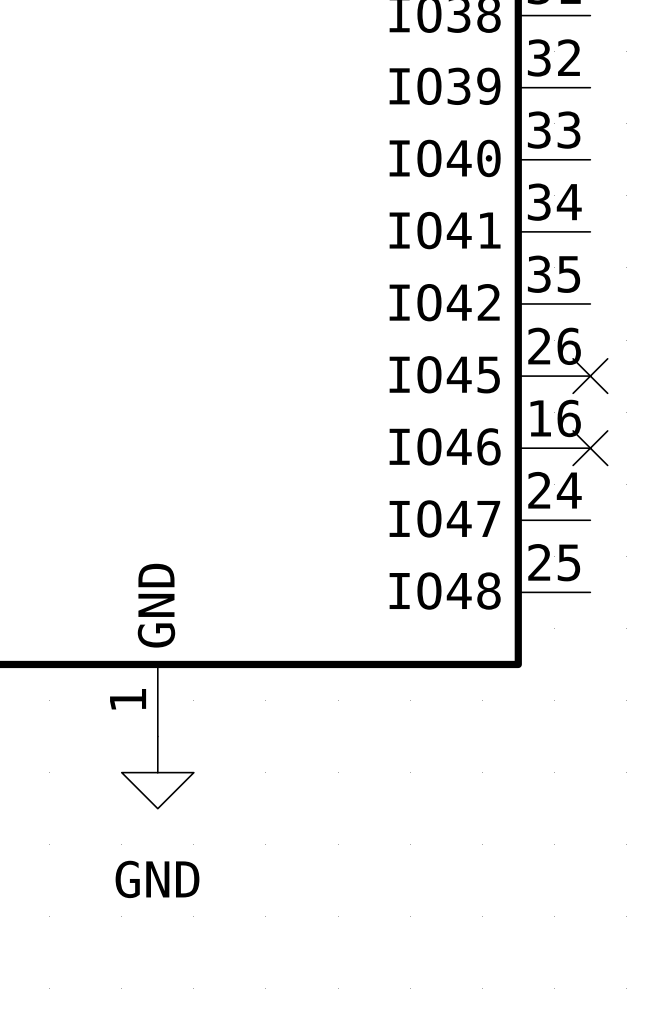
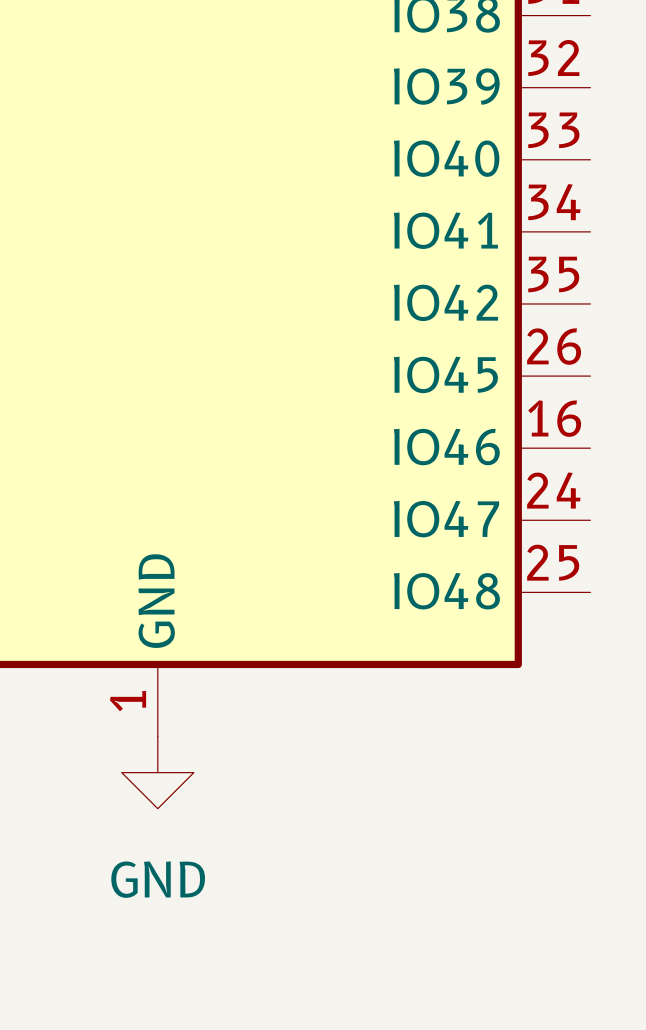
no-connect mark: (590, 376) -> none
no-connect mark: (590, 448) -> none

